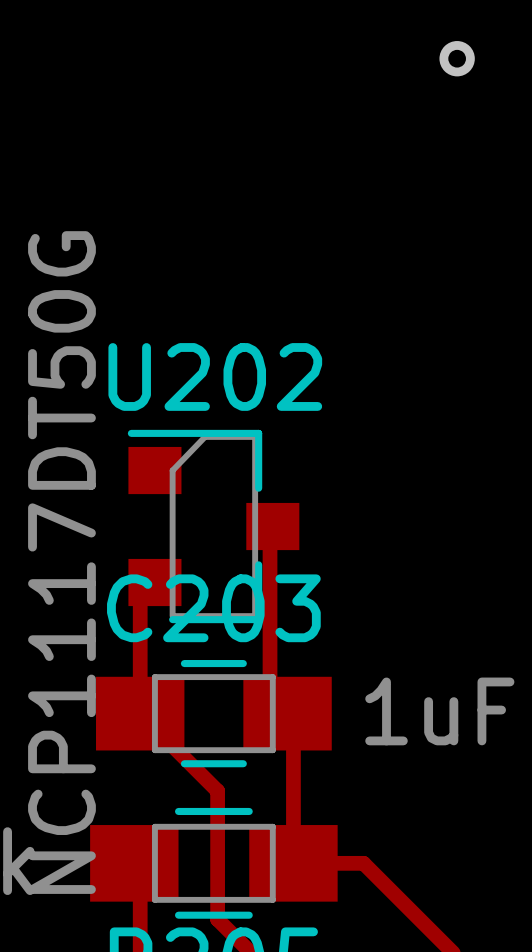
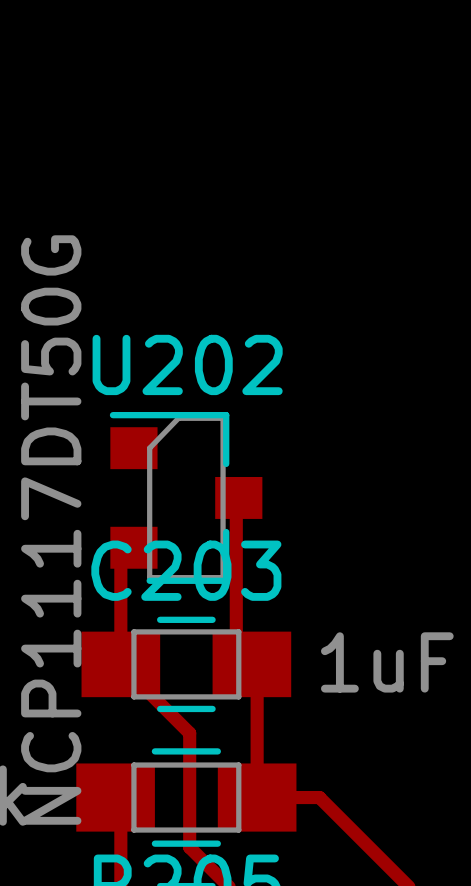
via: (457, 58) -> none

